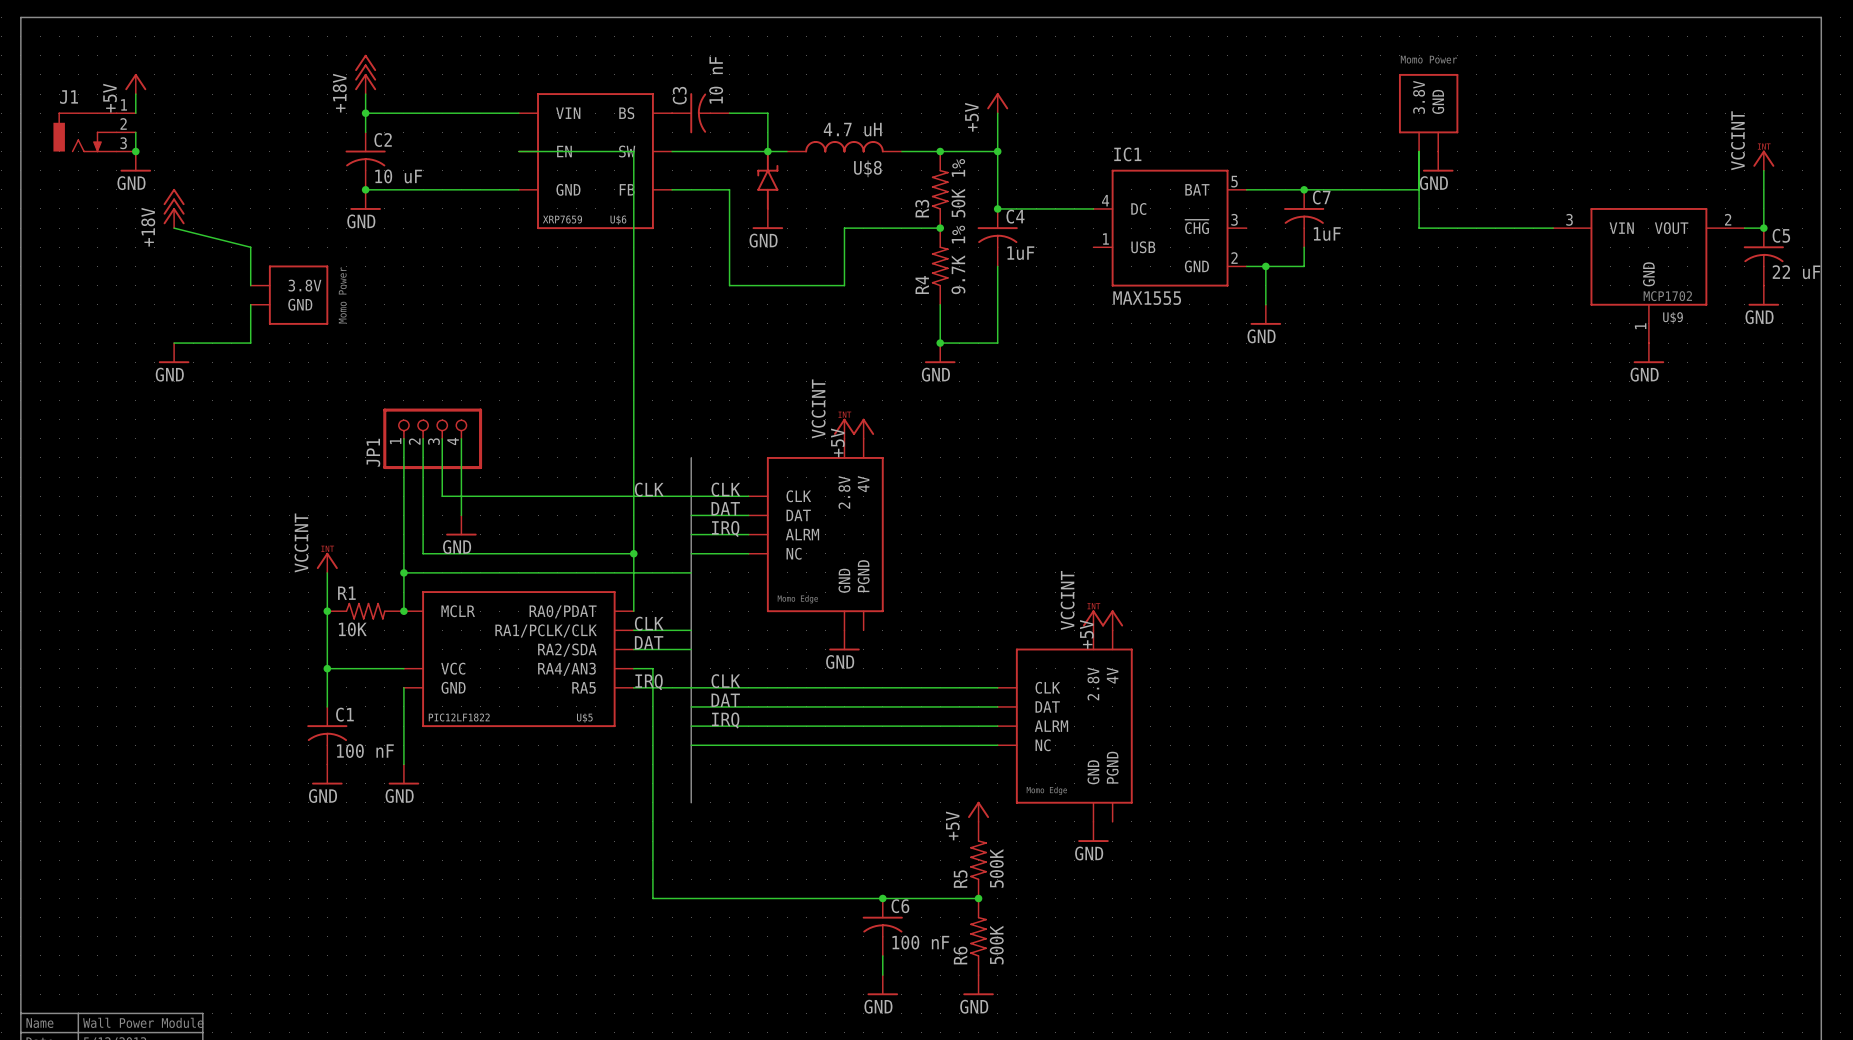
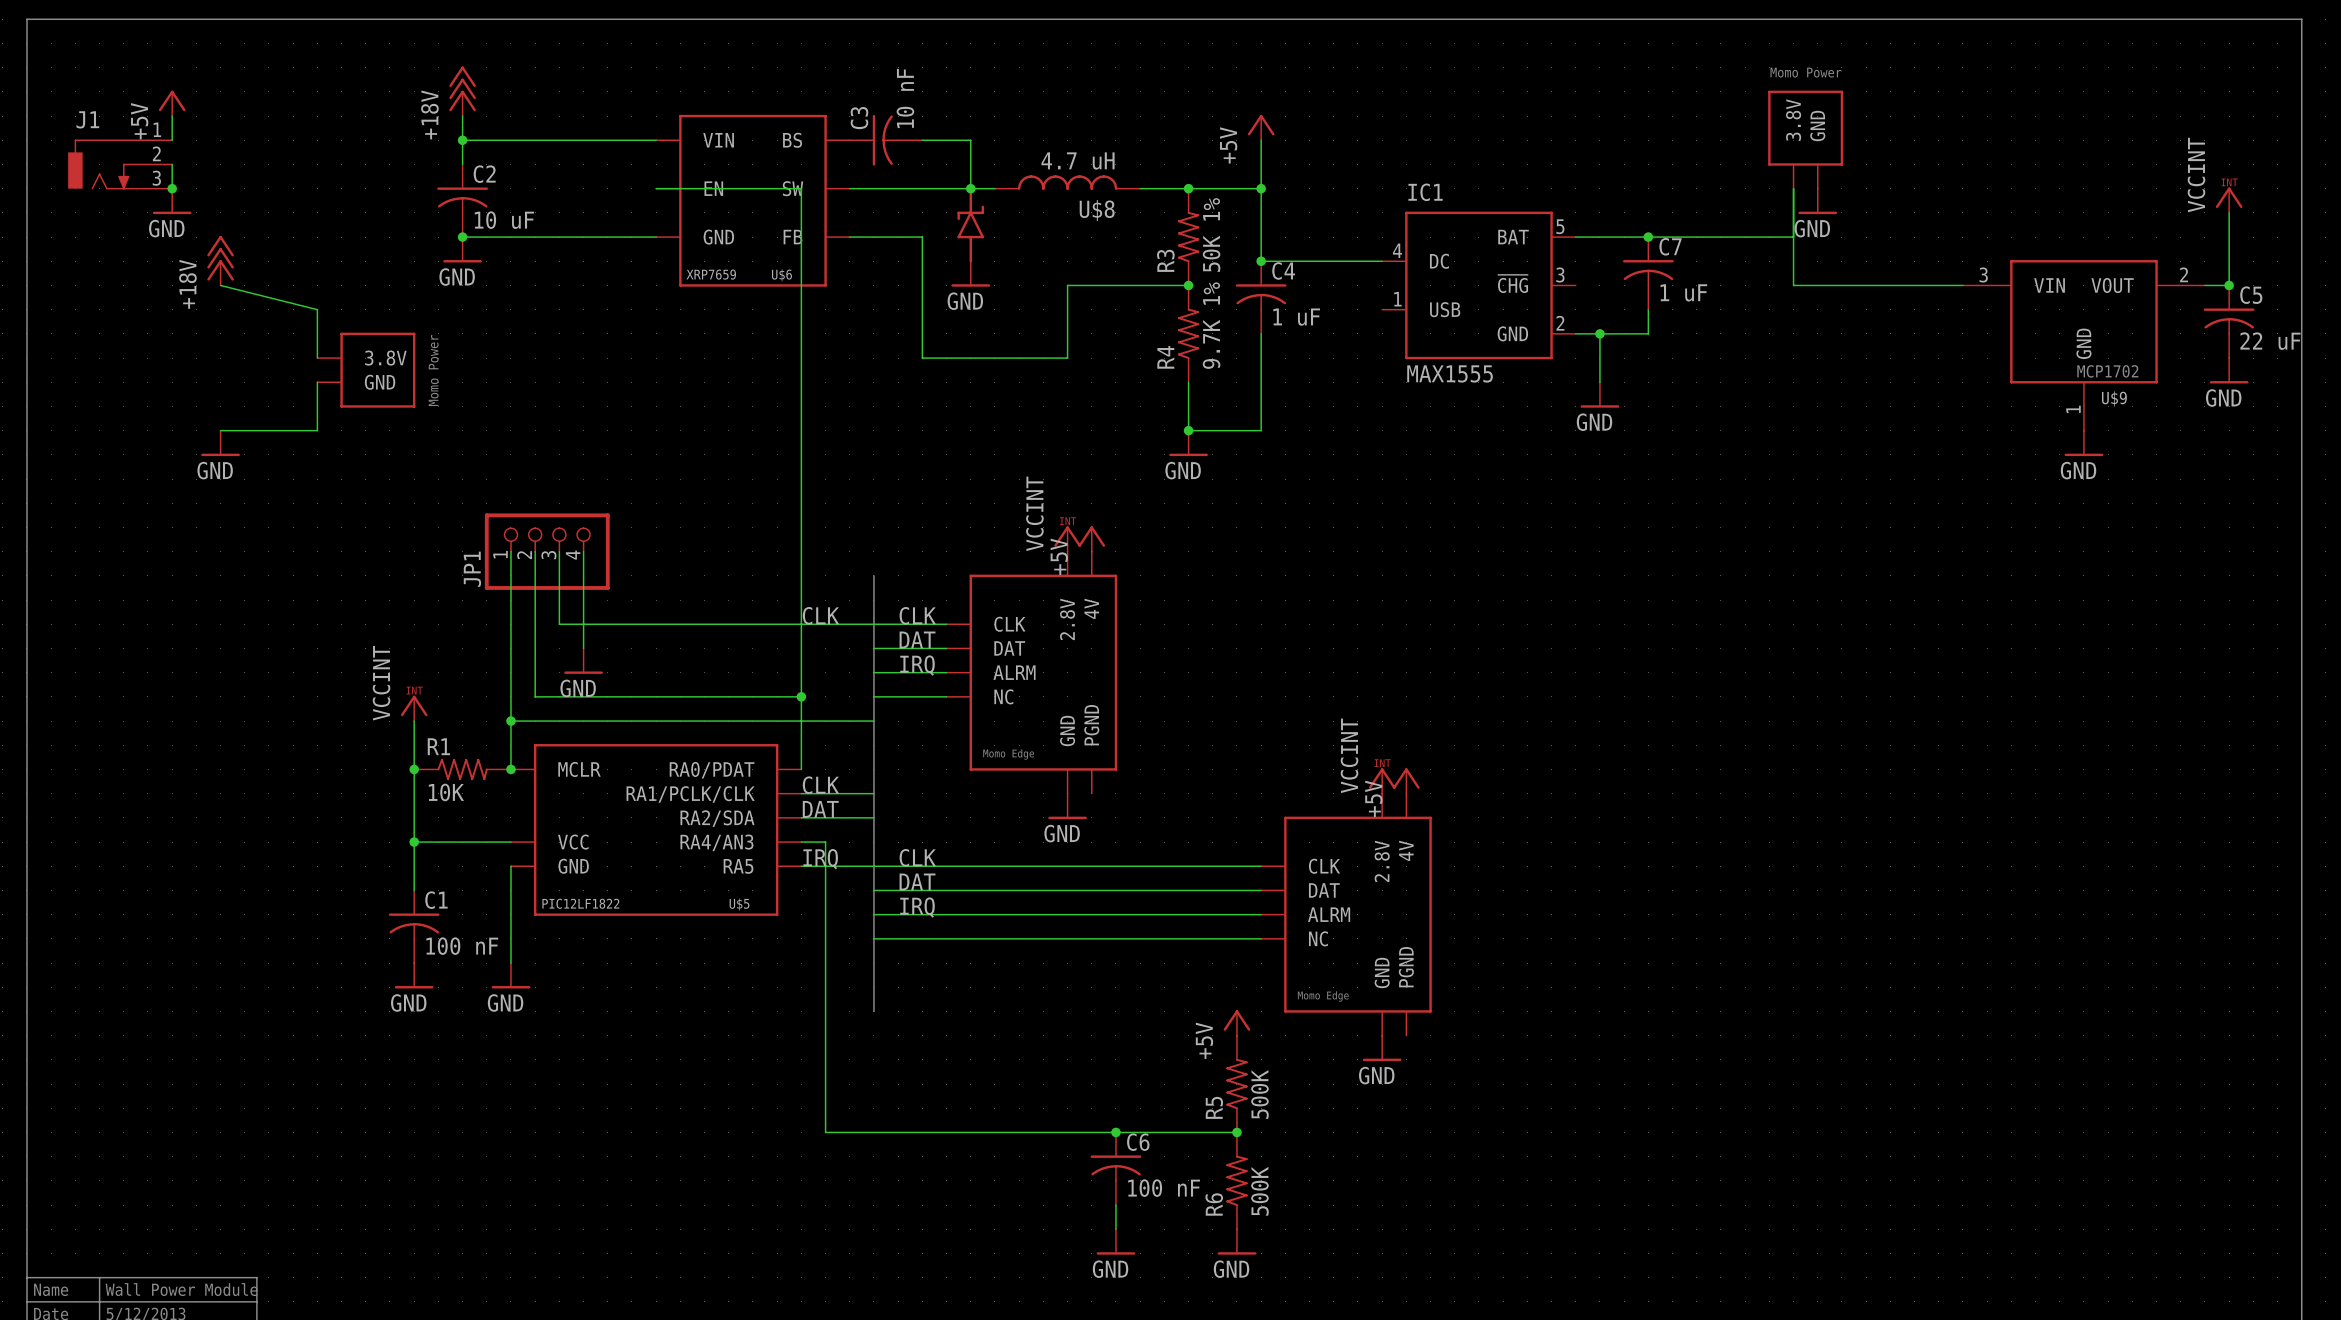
C7 value: 1uF (1327, 234) -> 1 uF (1683, 292)
C4 value: 1uF (1020, 253) -> 1 uF (1296, 317)

